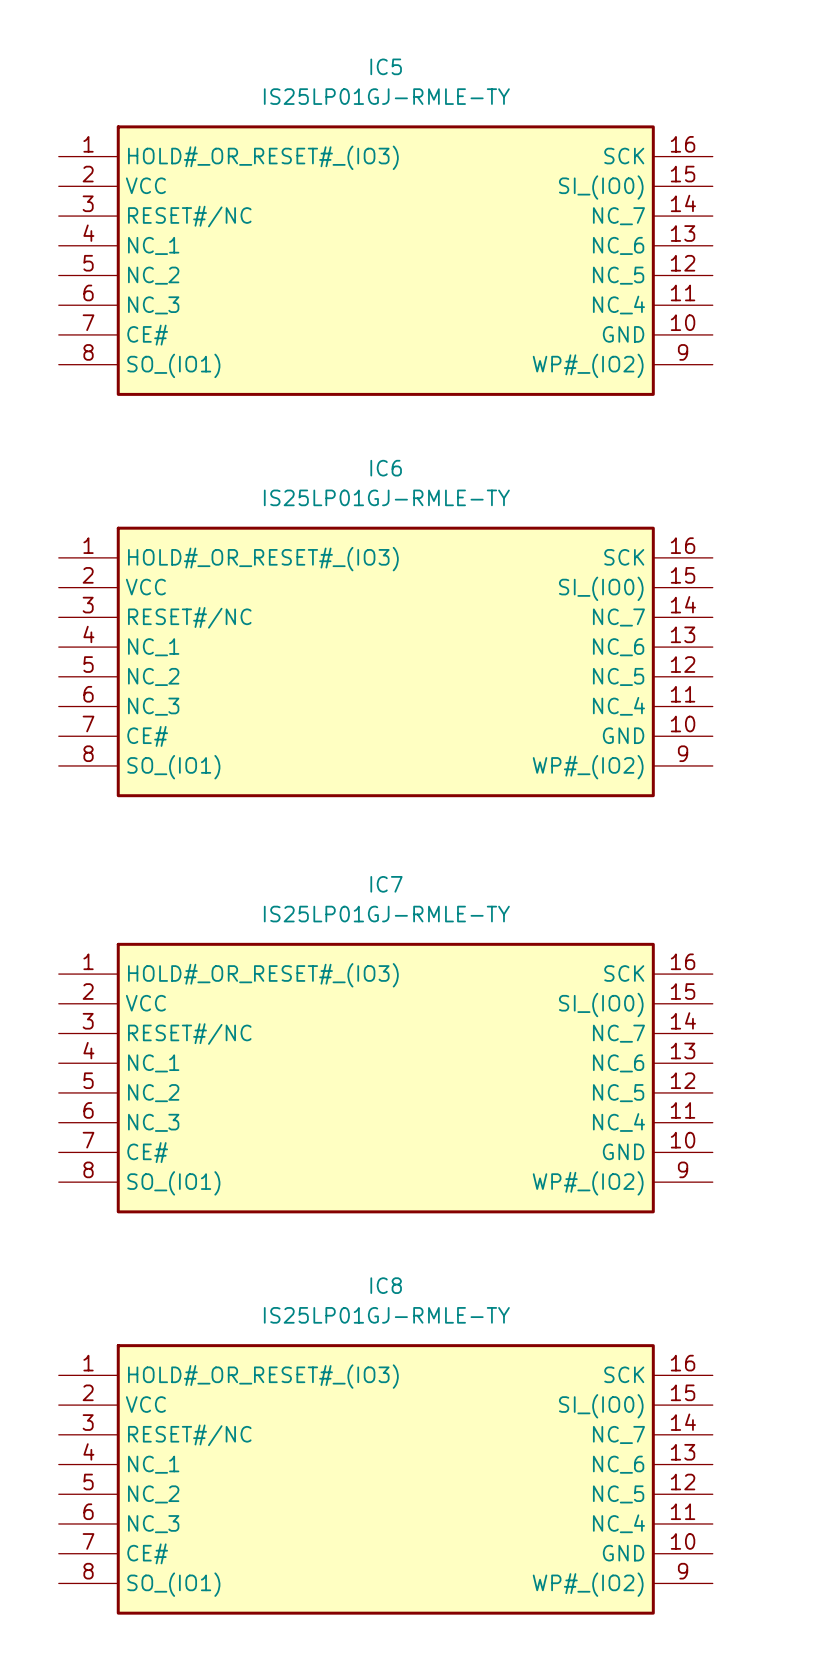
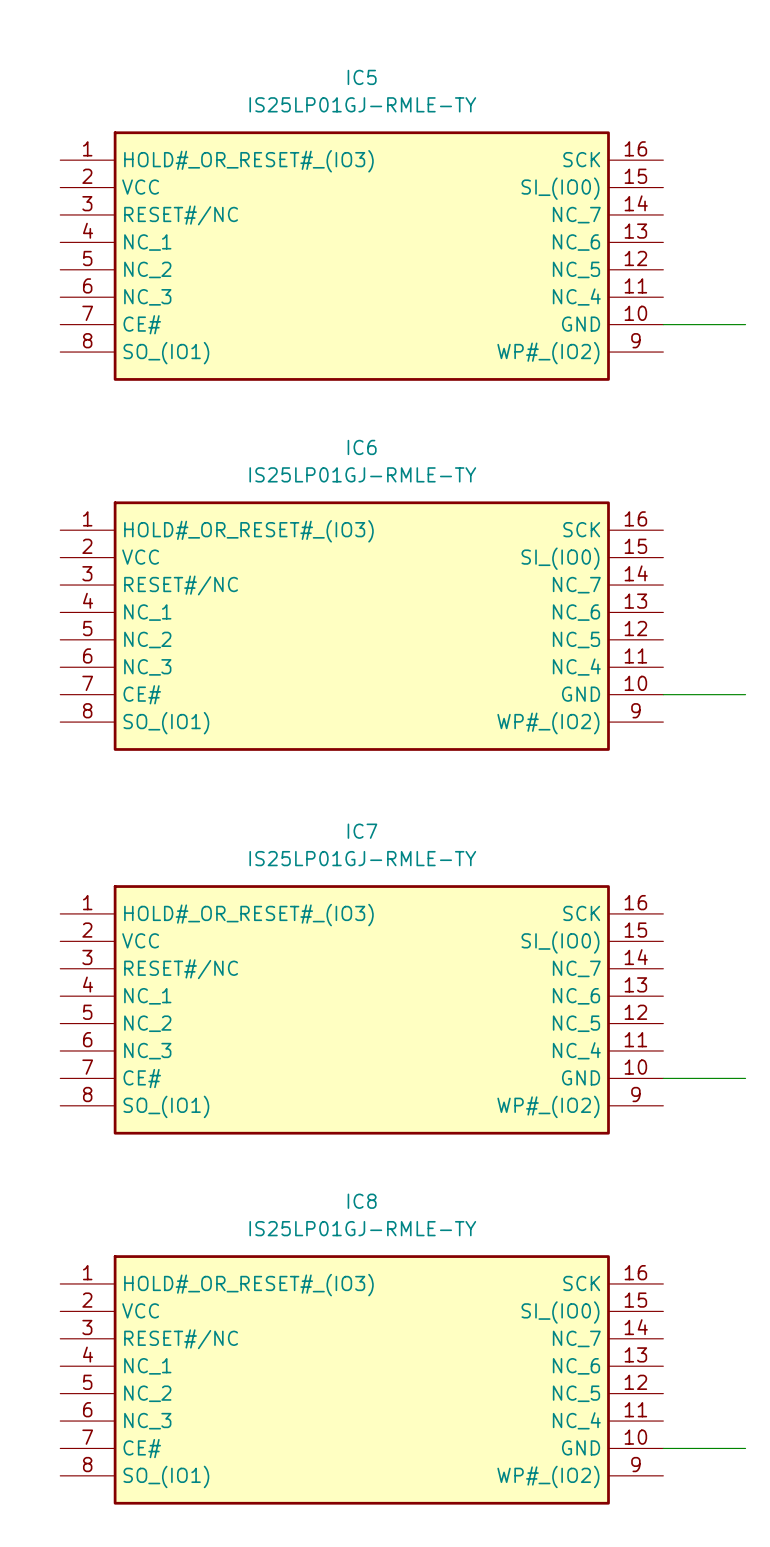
wire: none -> (663, 324) (745, 324)
wire: none -> (663, 694) (745, 694)
wire: none -> (663, 1078) (745, 1078)
wire: none -> (663, 1448) (745, 1448)

